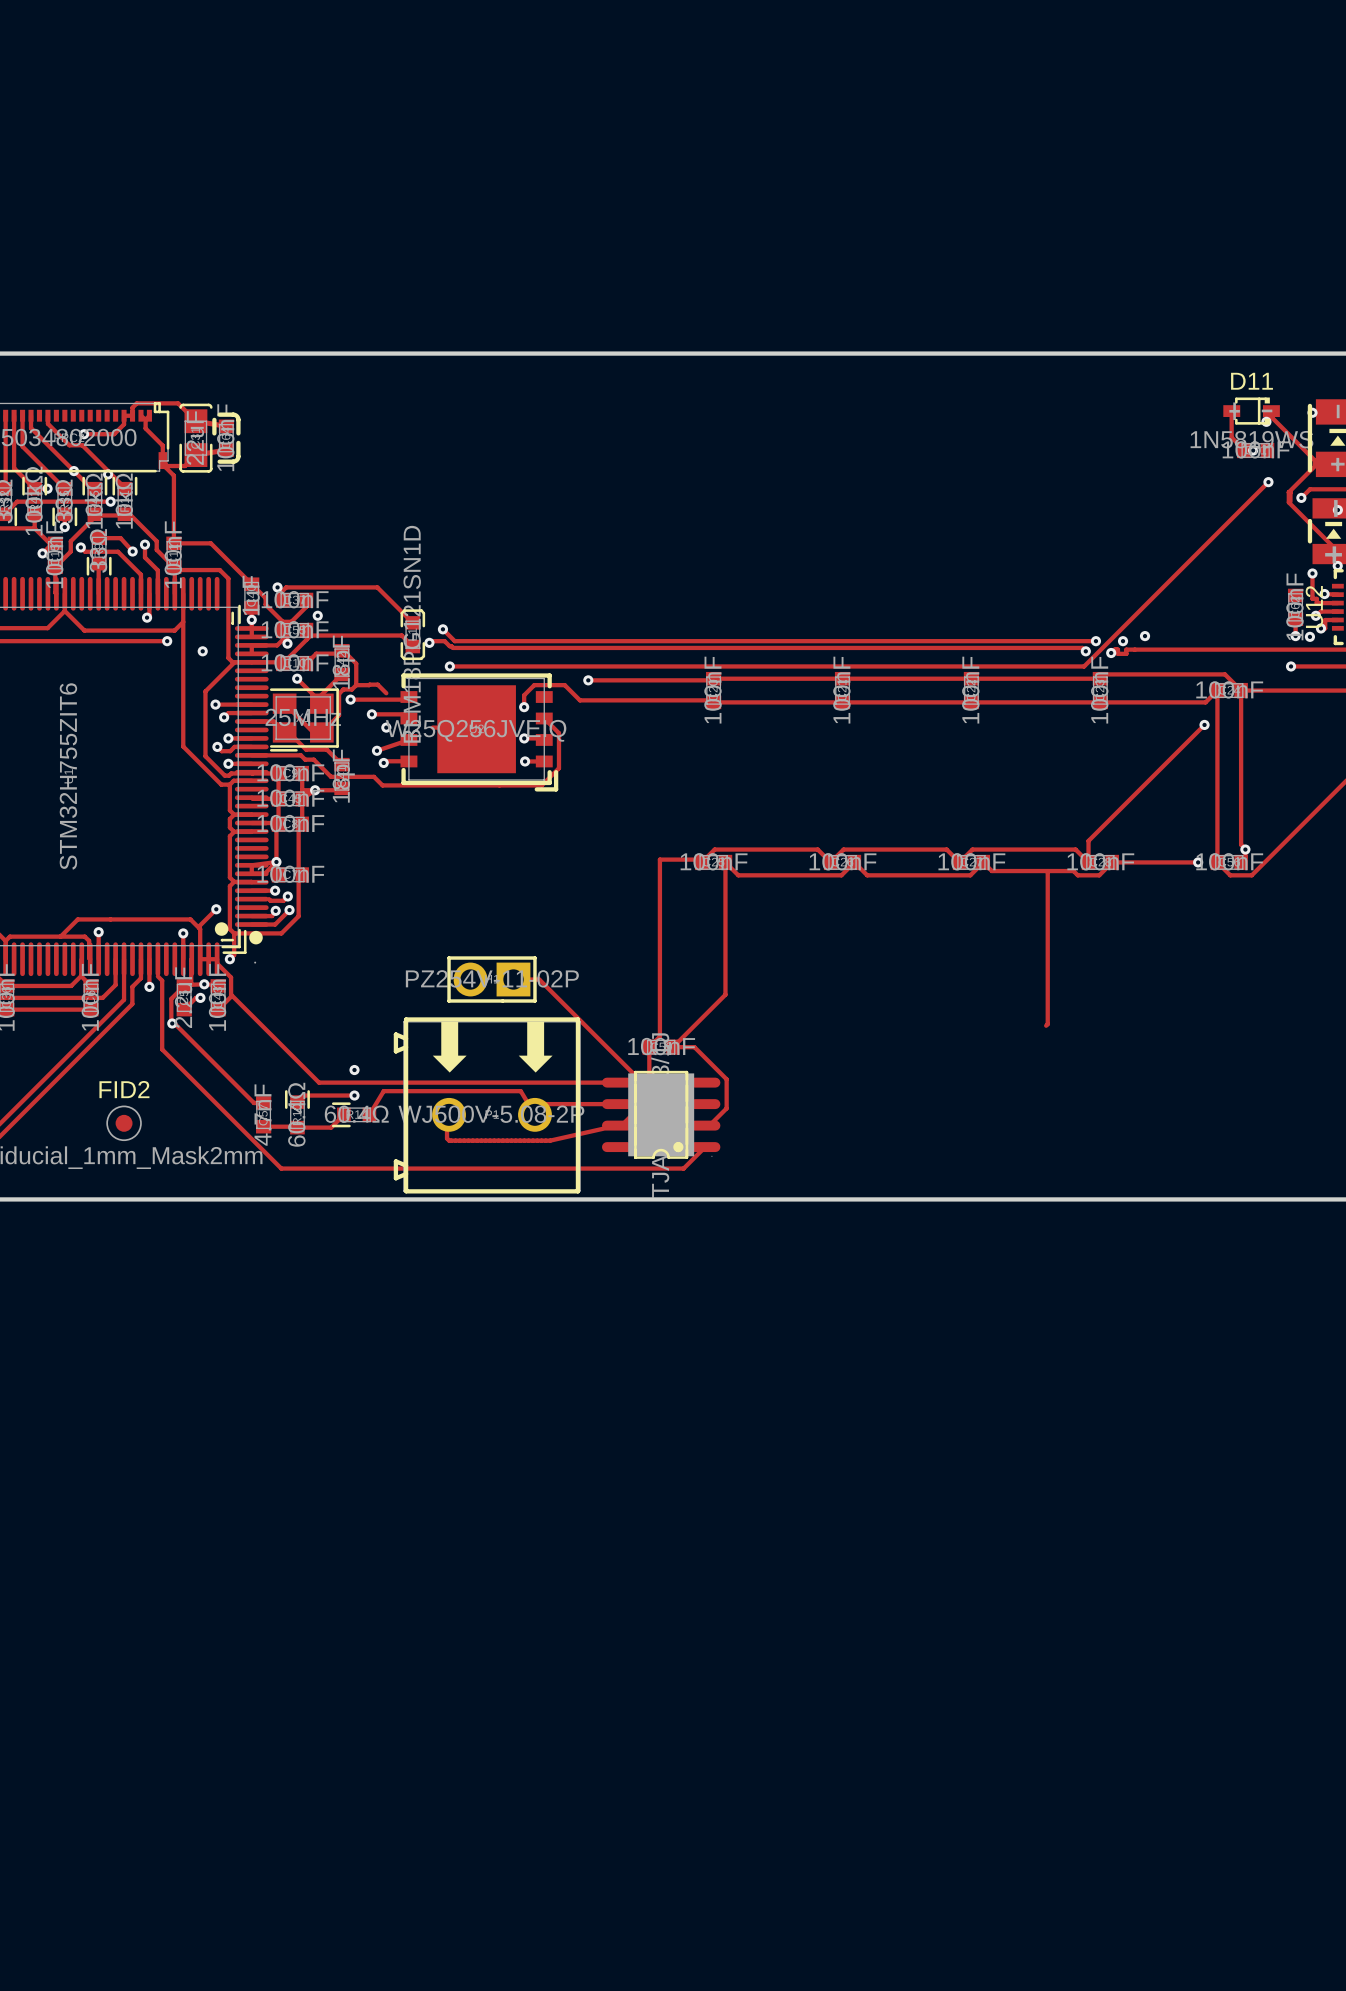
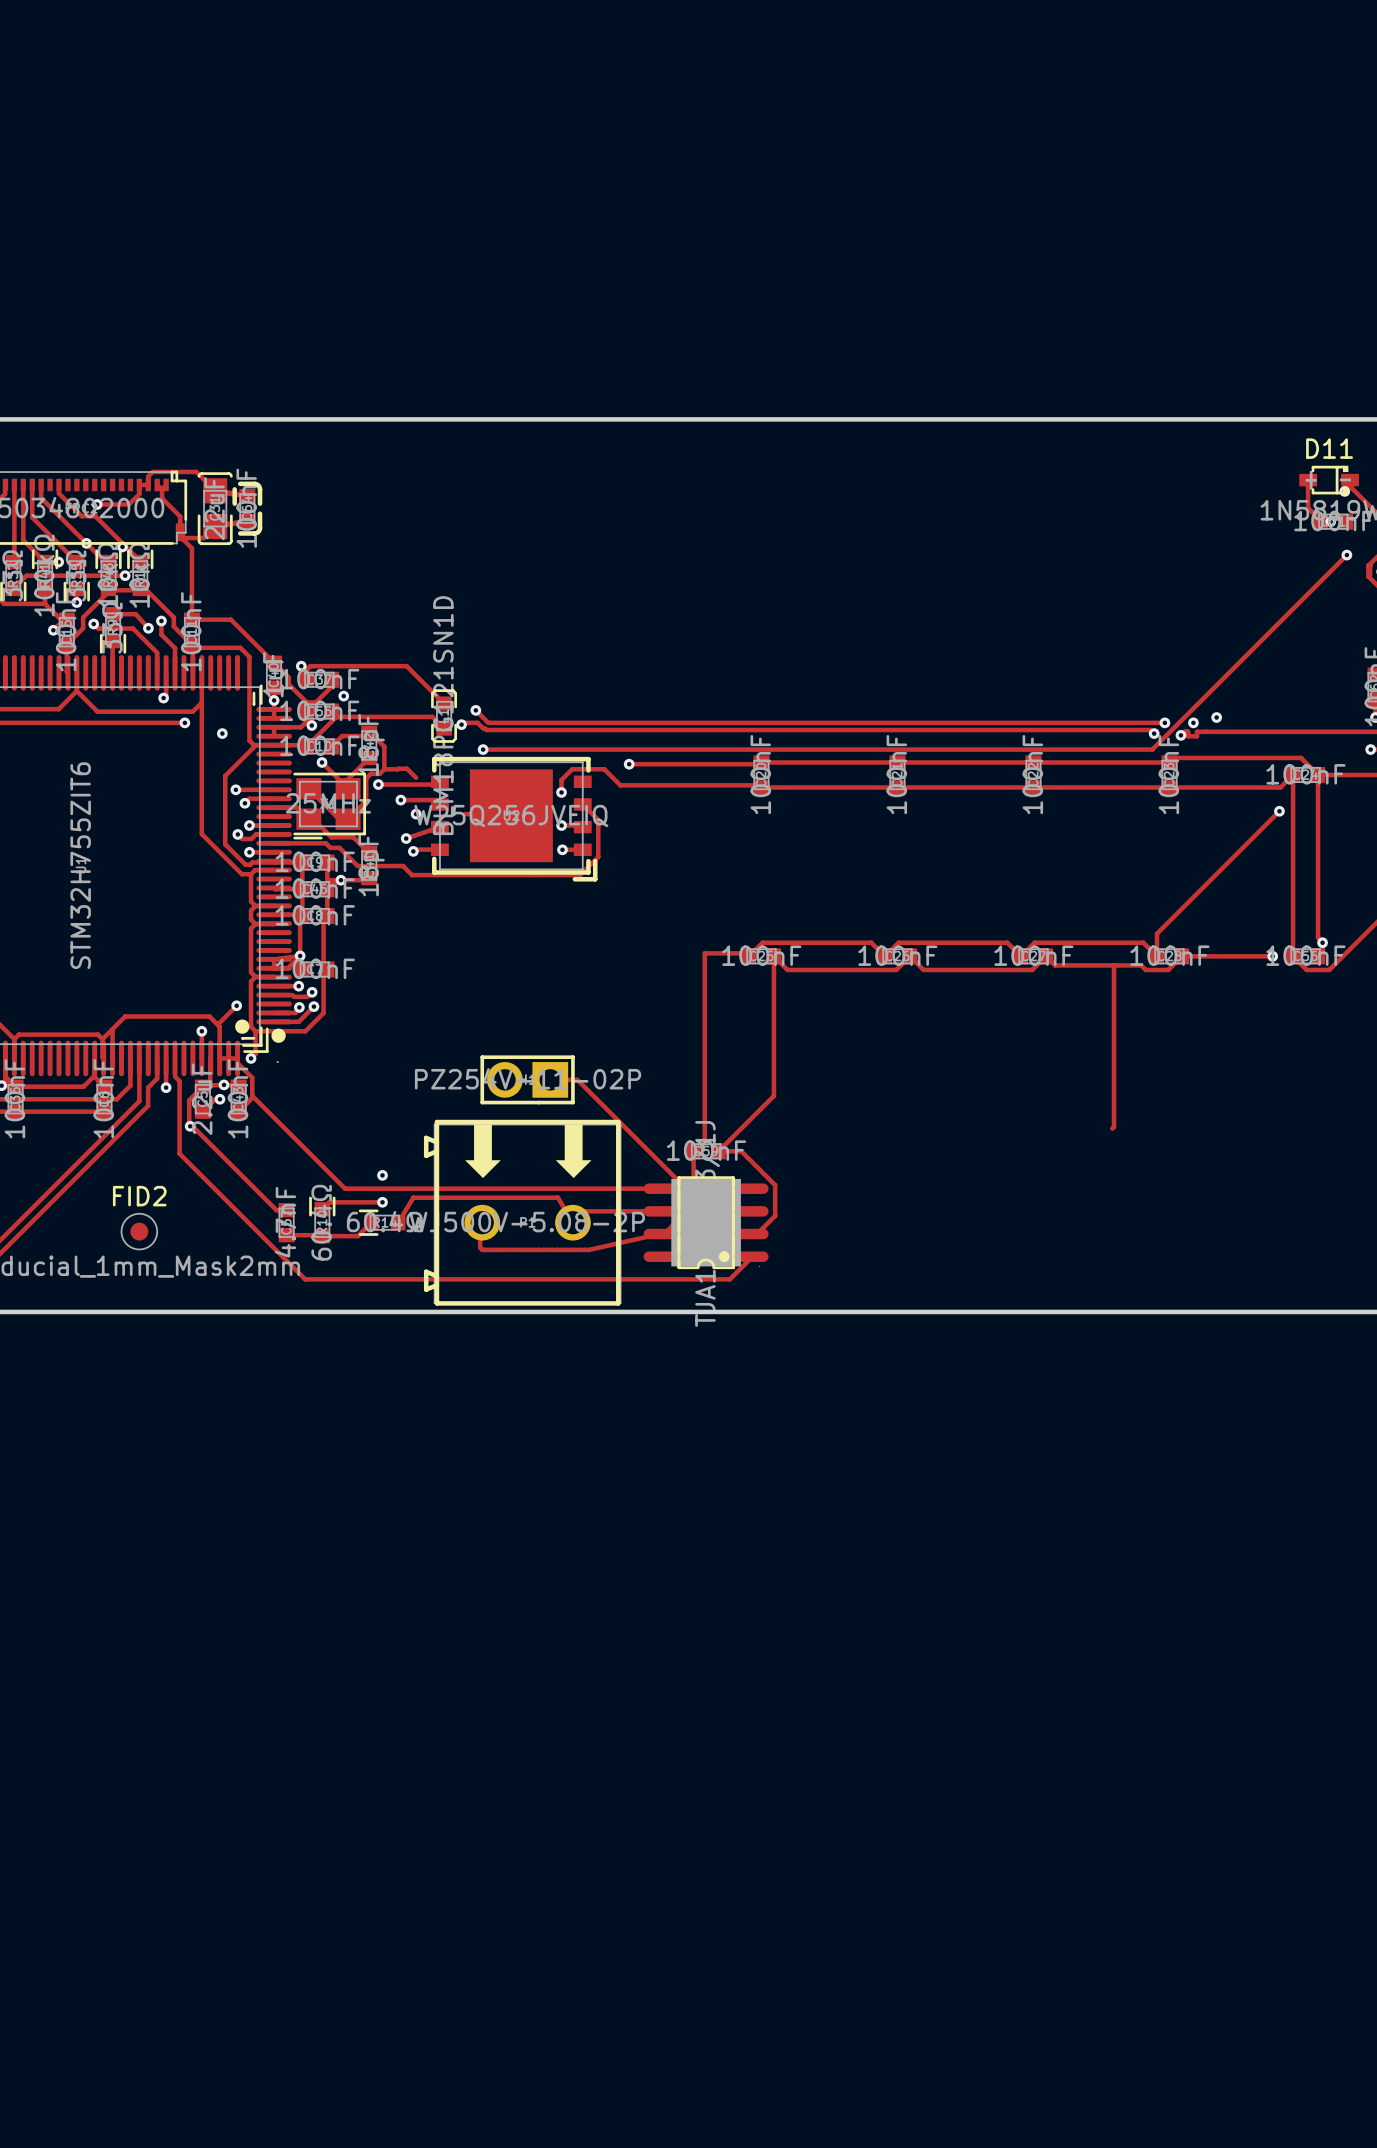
track: (110, 919) (77, 919) (60, 936) -> (125, 1016) (102, 1039)
via: (98, 932) -> none

